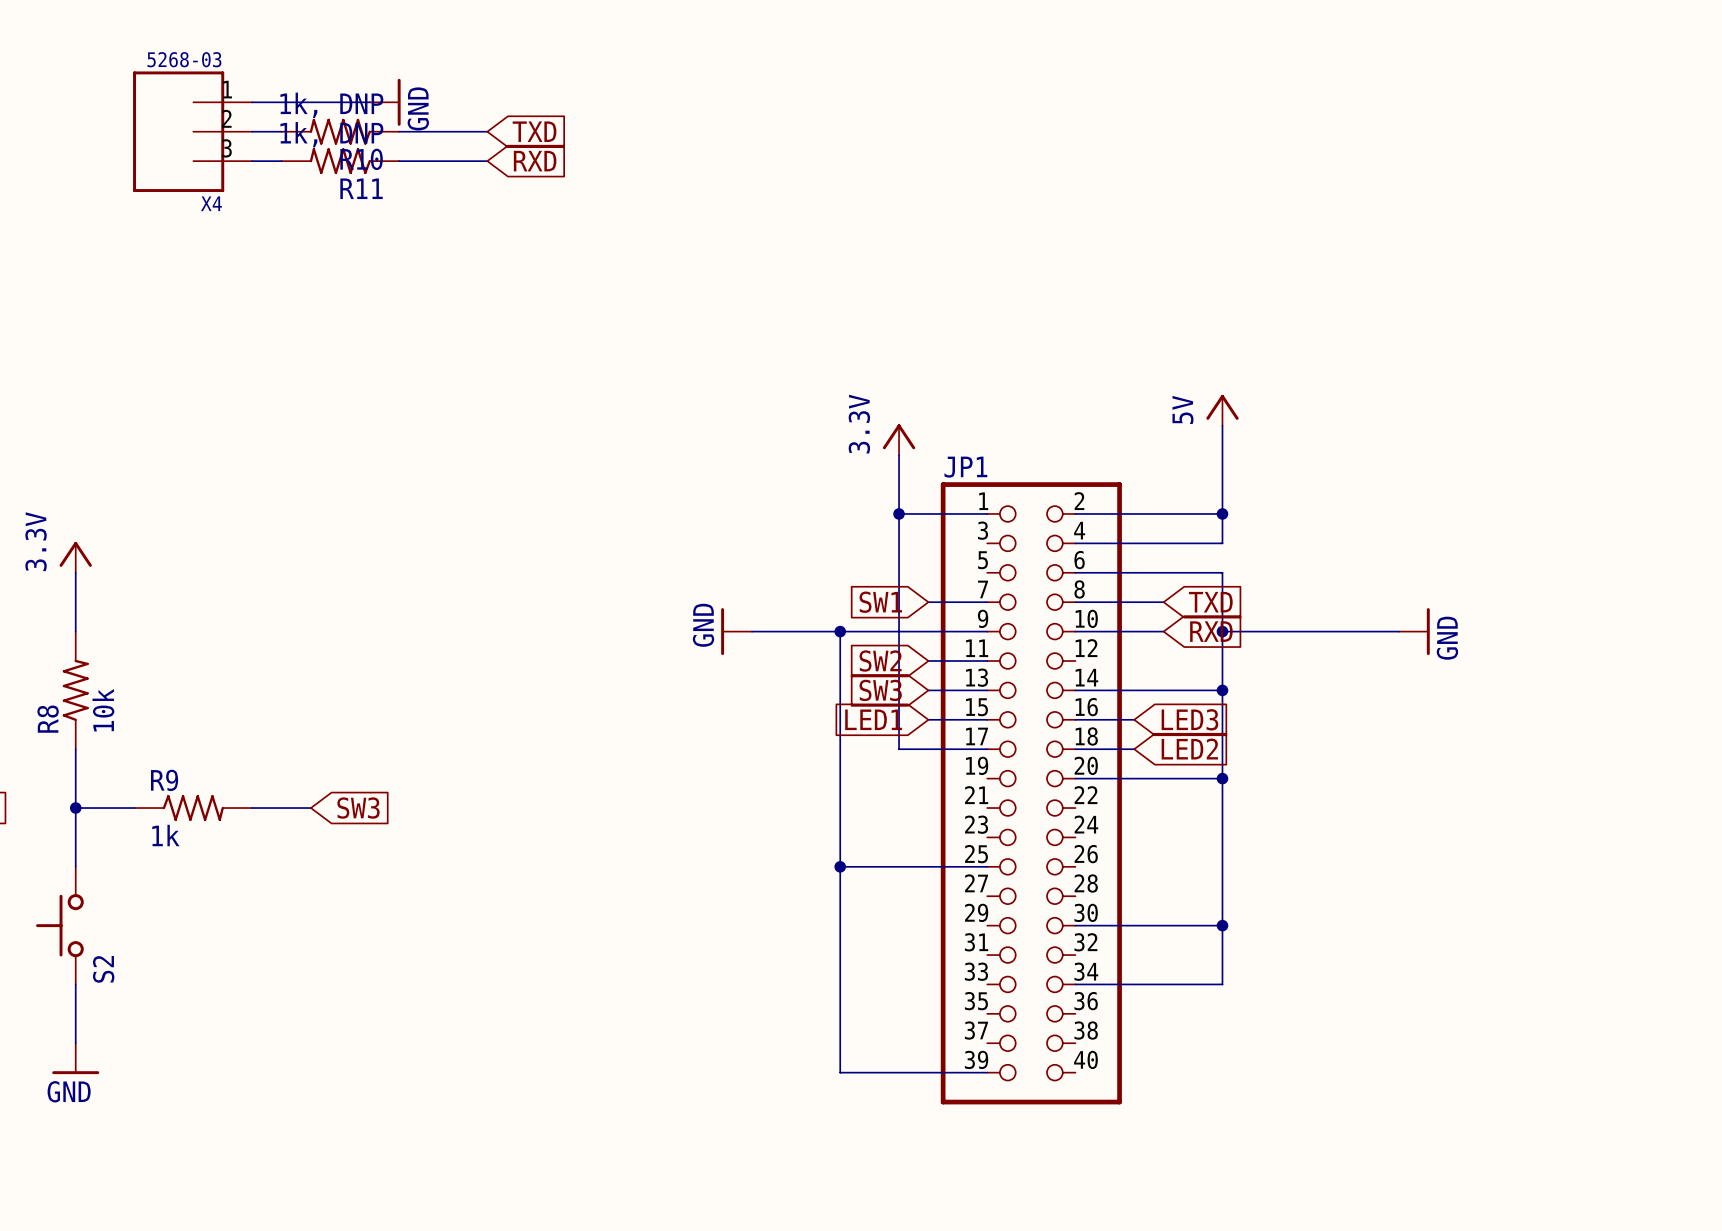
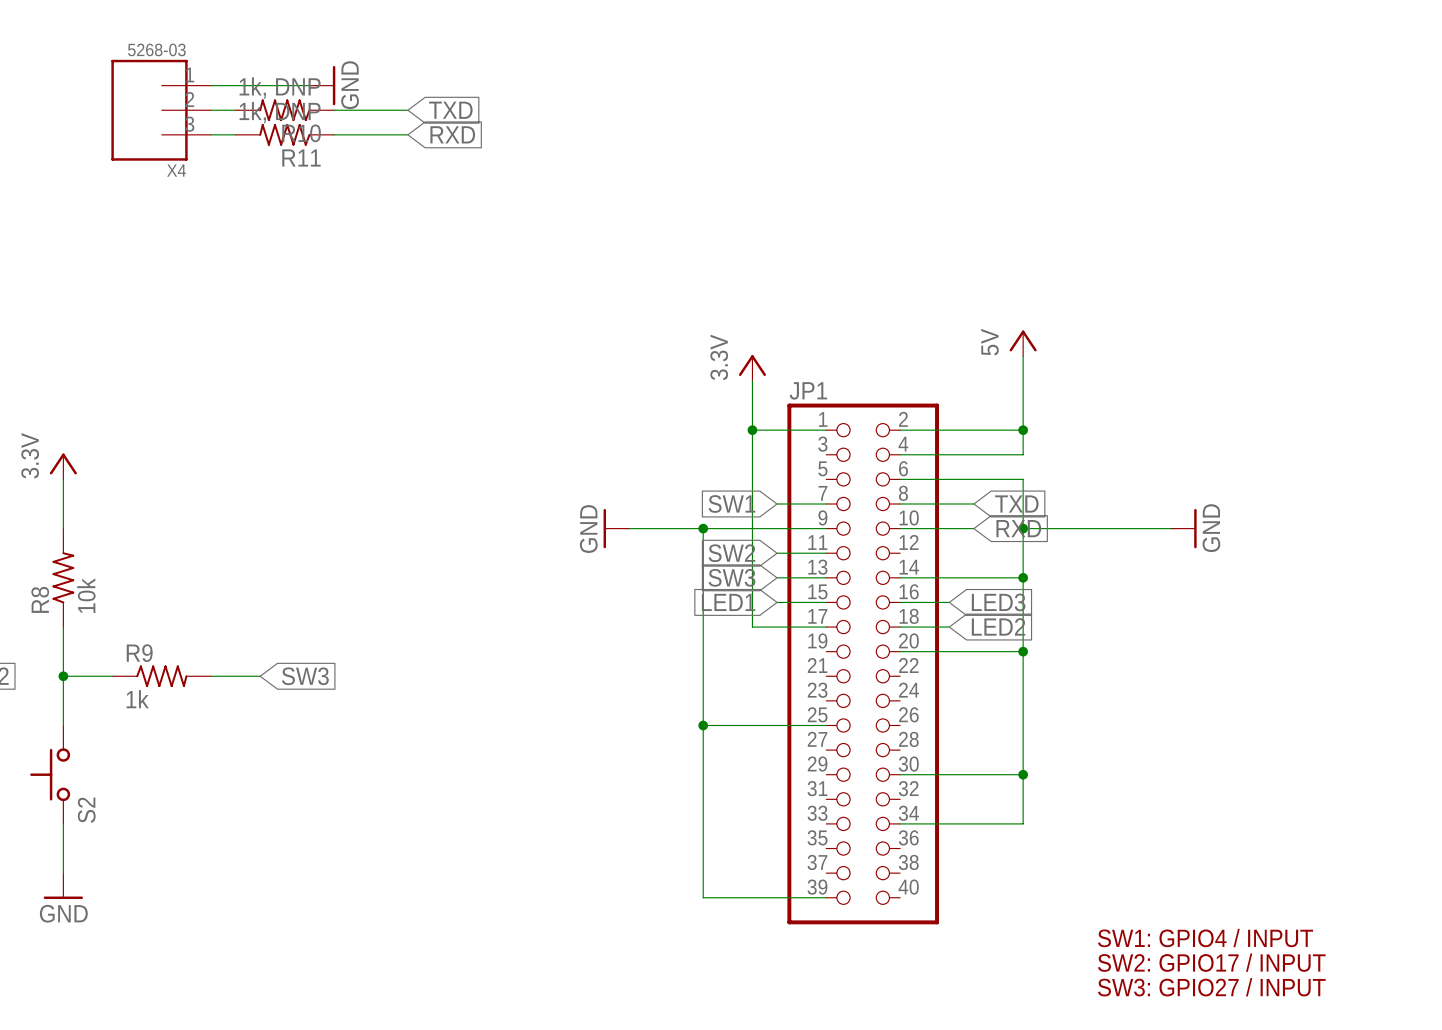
text: none -> SW1: GPIO4 / INPUT (1205, 938)
text: none -> SW2: GPIO17 / INPUT (1211, 962)
text: none -> SW3: GPIO27 / INPUT (1211, 987)

